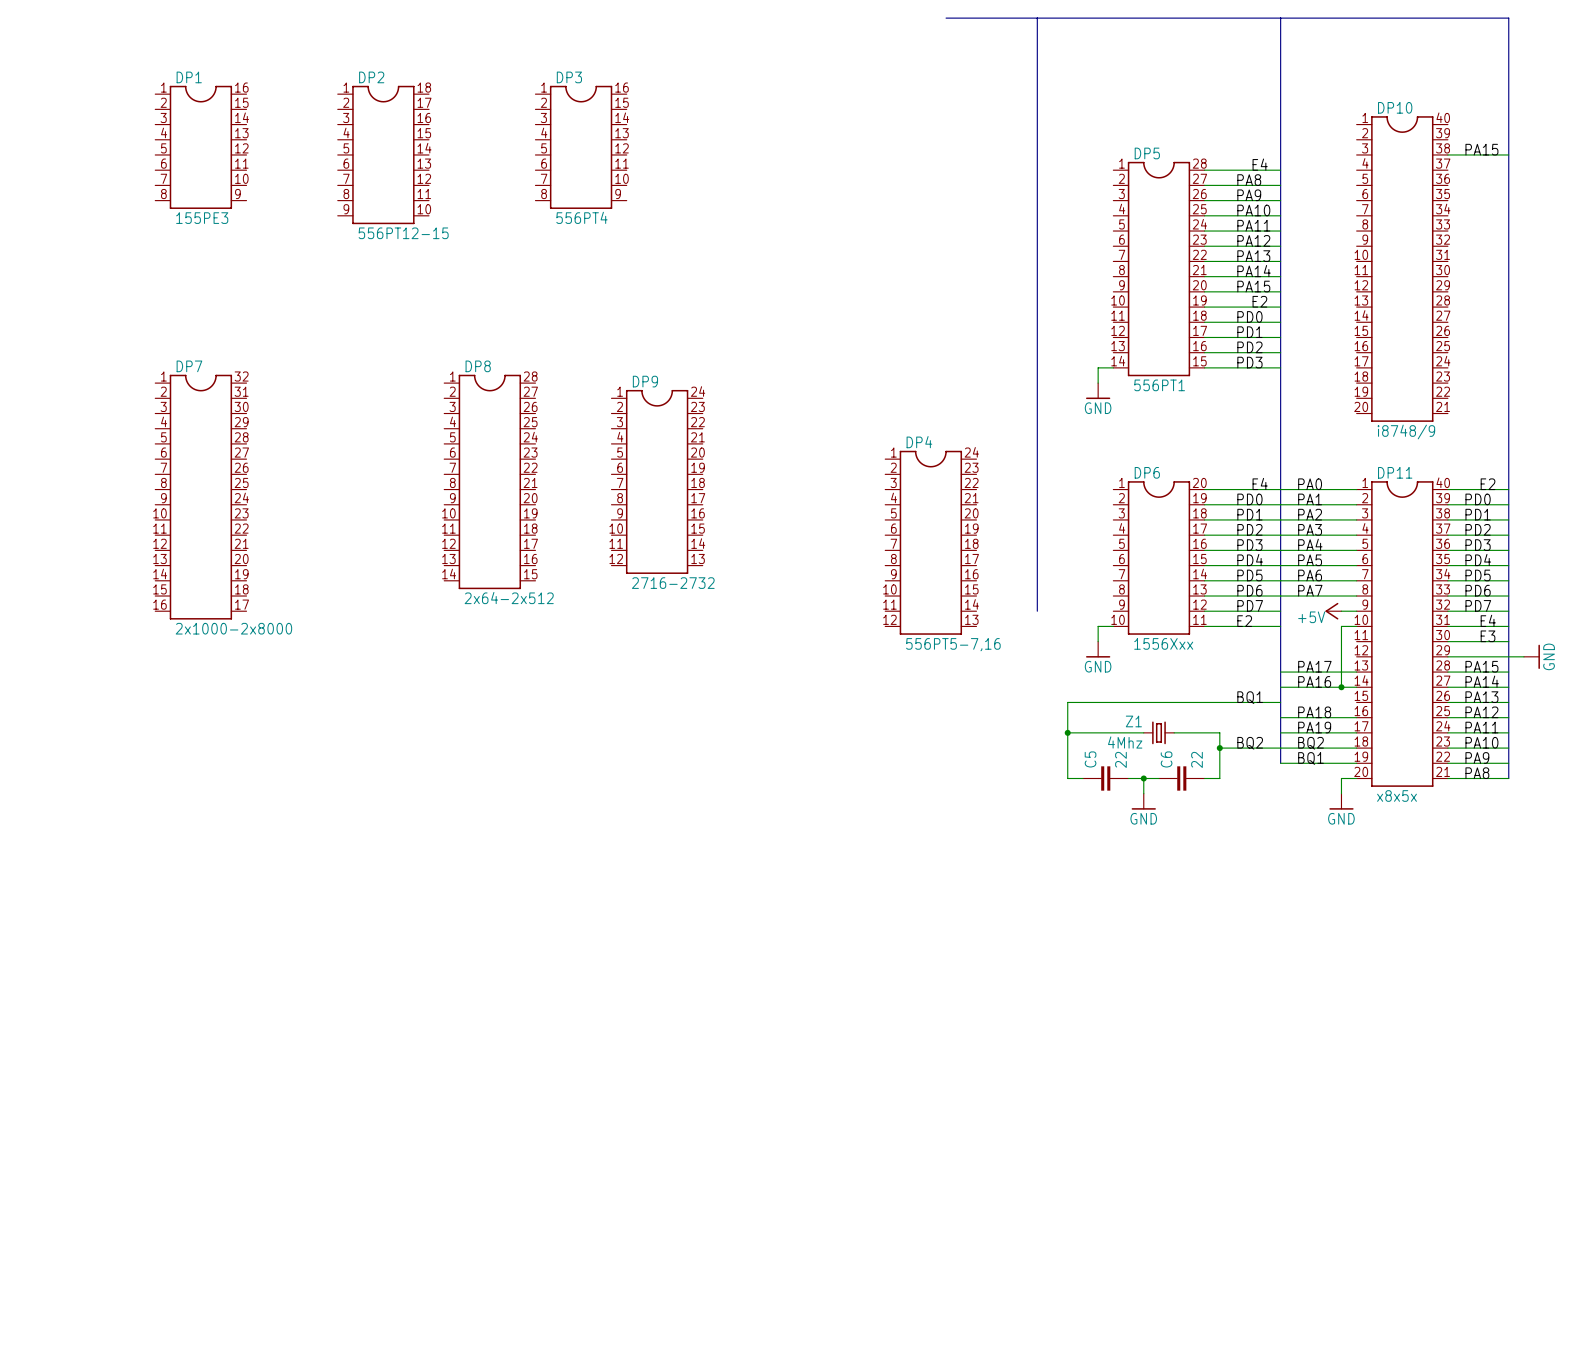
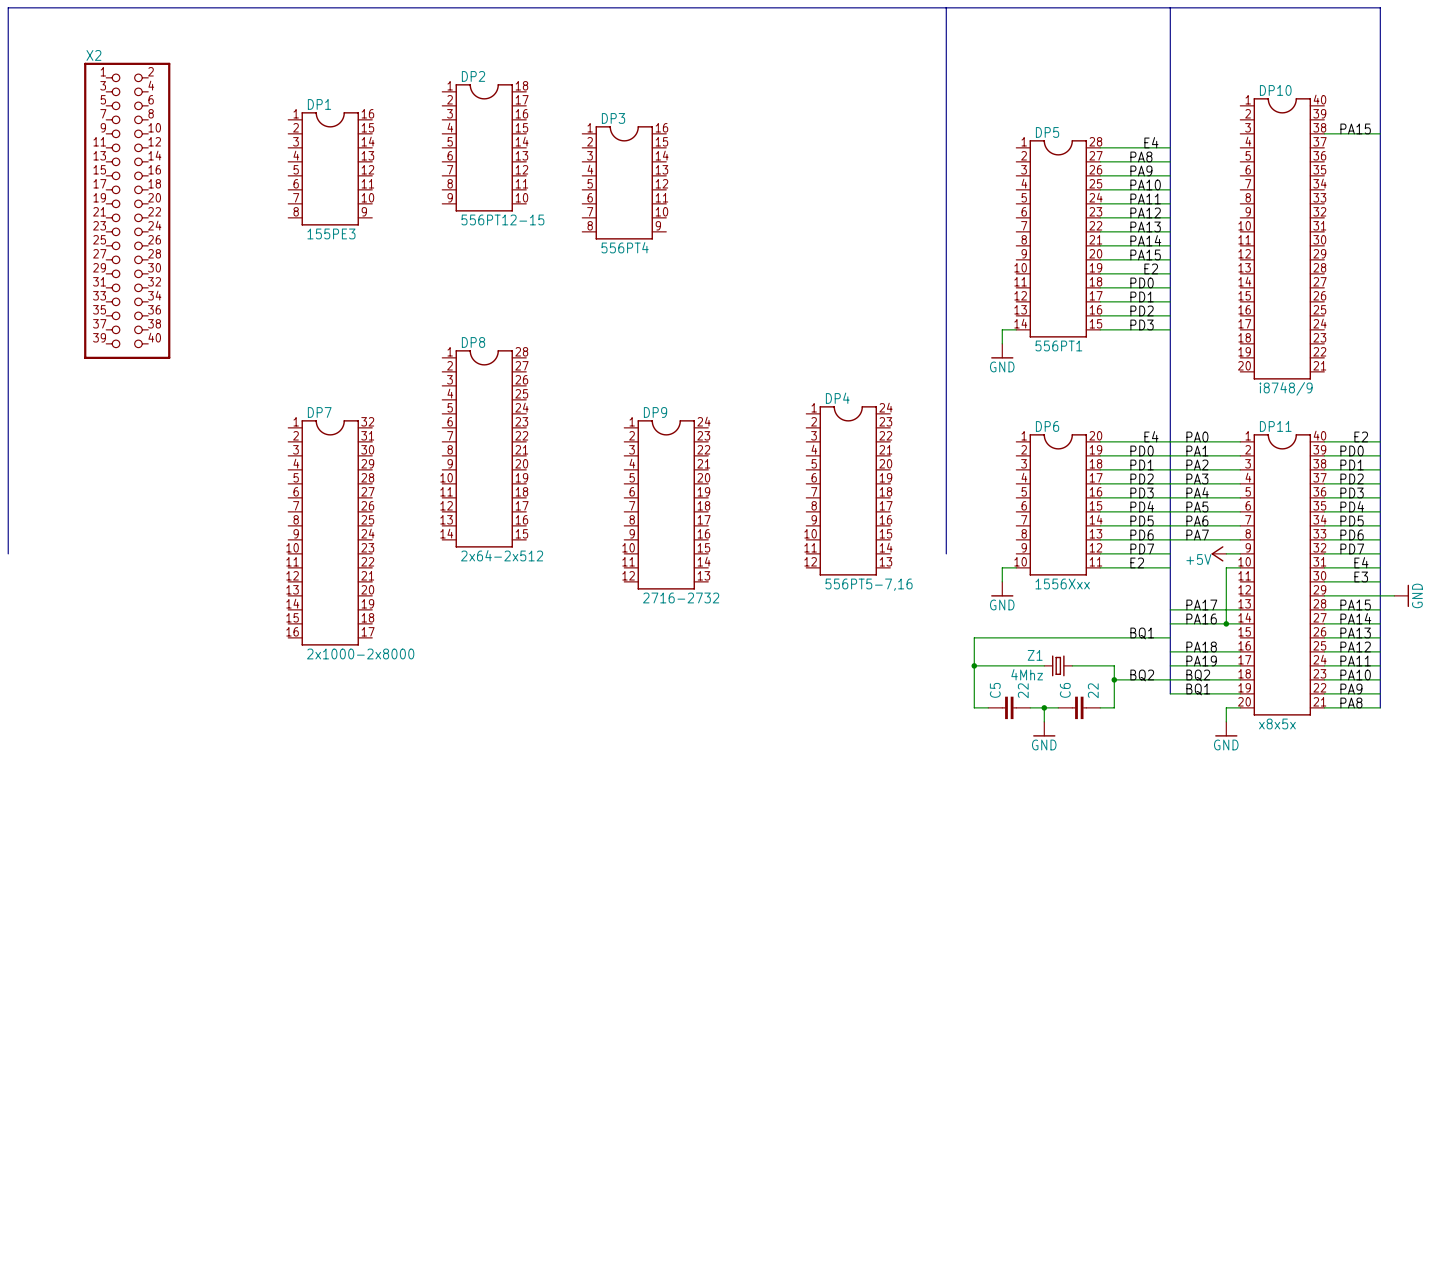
bus: none -> (862, 7) (8, 7) (8, 553)
DP1 position: (200, 147) -> (330, 168)
DP3 position: (581, 147) -> (624, 182)
DP2 position: (383, 154) -> (484, 147)
X2: none -> (127, 210)
DP8 position: (489, 481) -> (484, 448)
DP9 position: (657, 481) -> (666, 504)
DP7 position: (200, 497) -> (330, 532)

